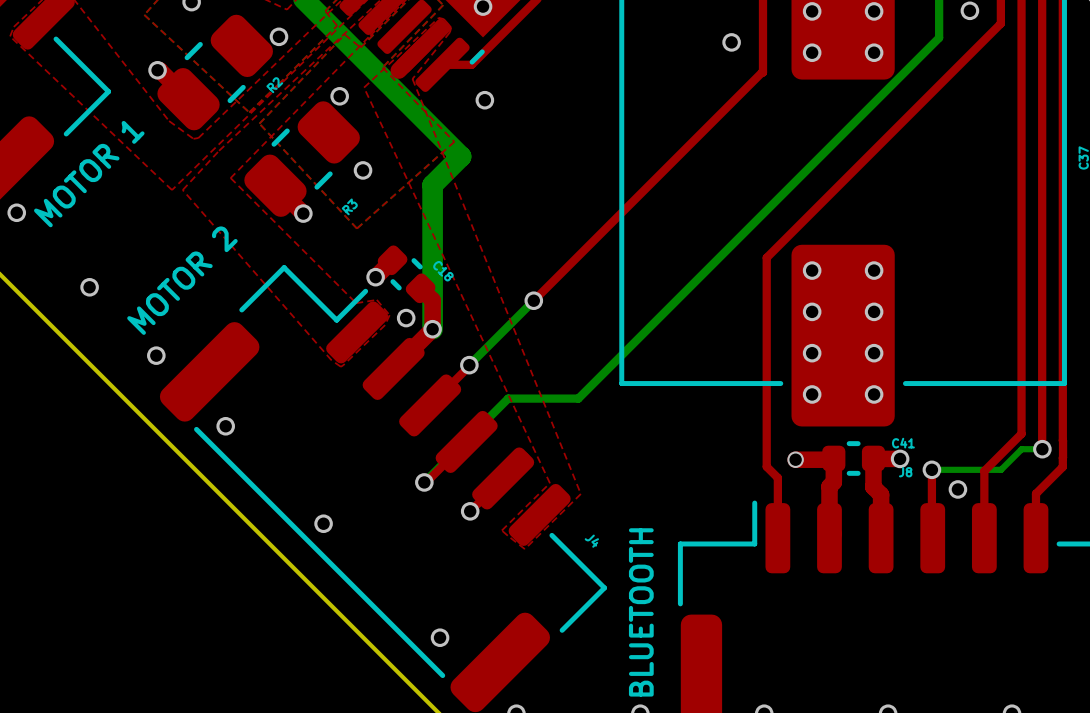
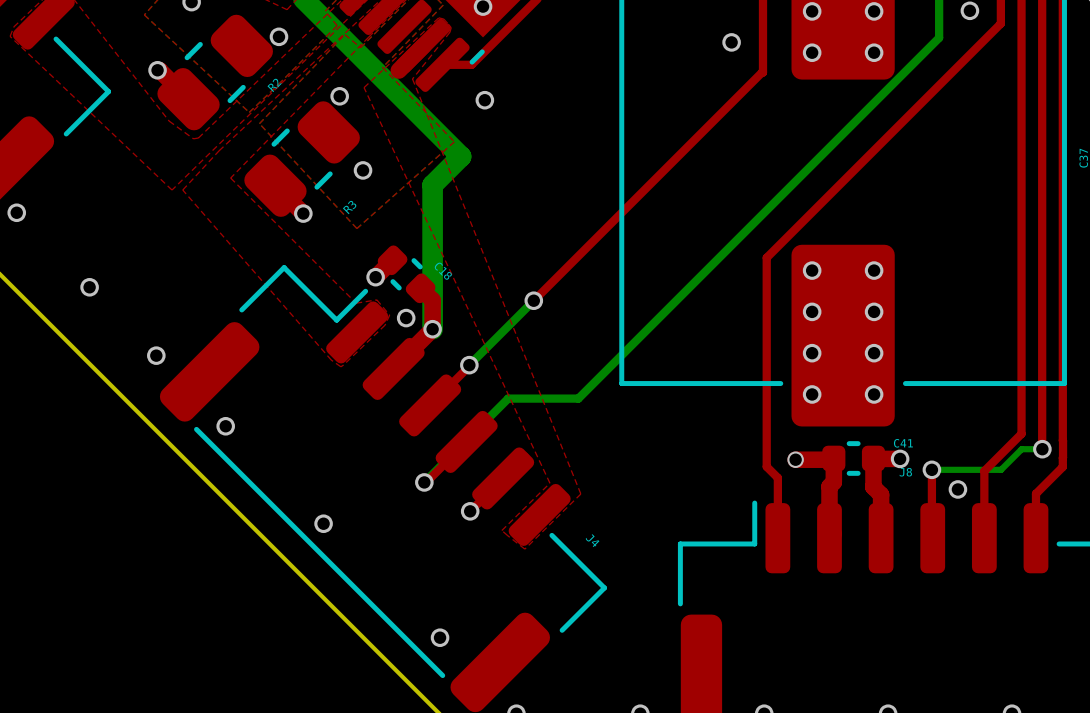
text: MOTOR 1 (89, 174) -> none
text: MOTOR 2 (182, 280) -> none
text: BLUETOOTH (641, 612) -> none

